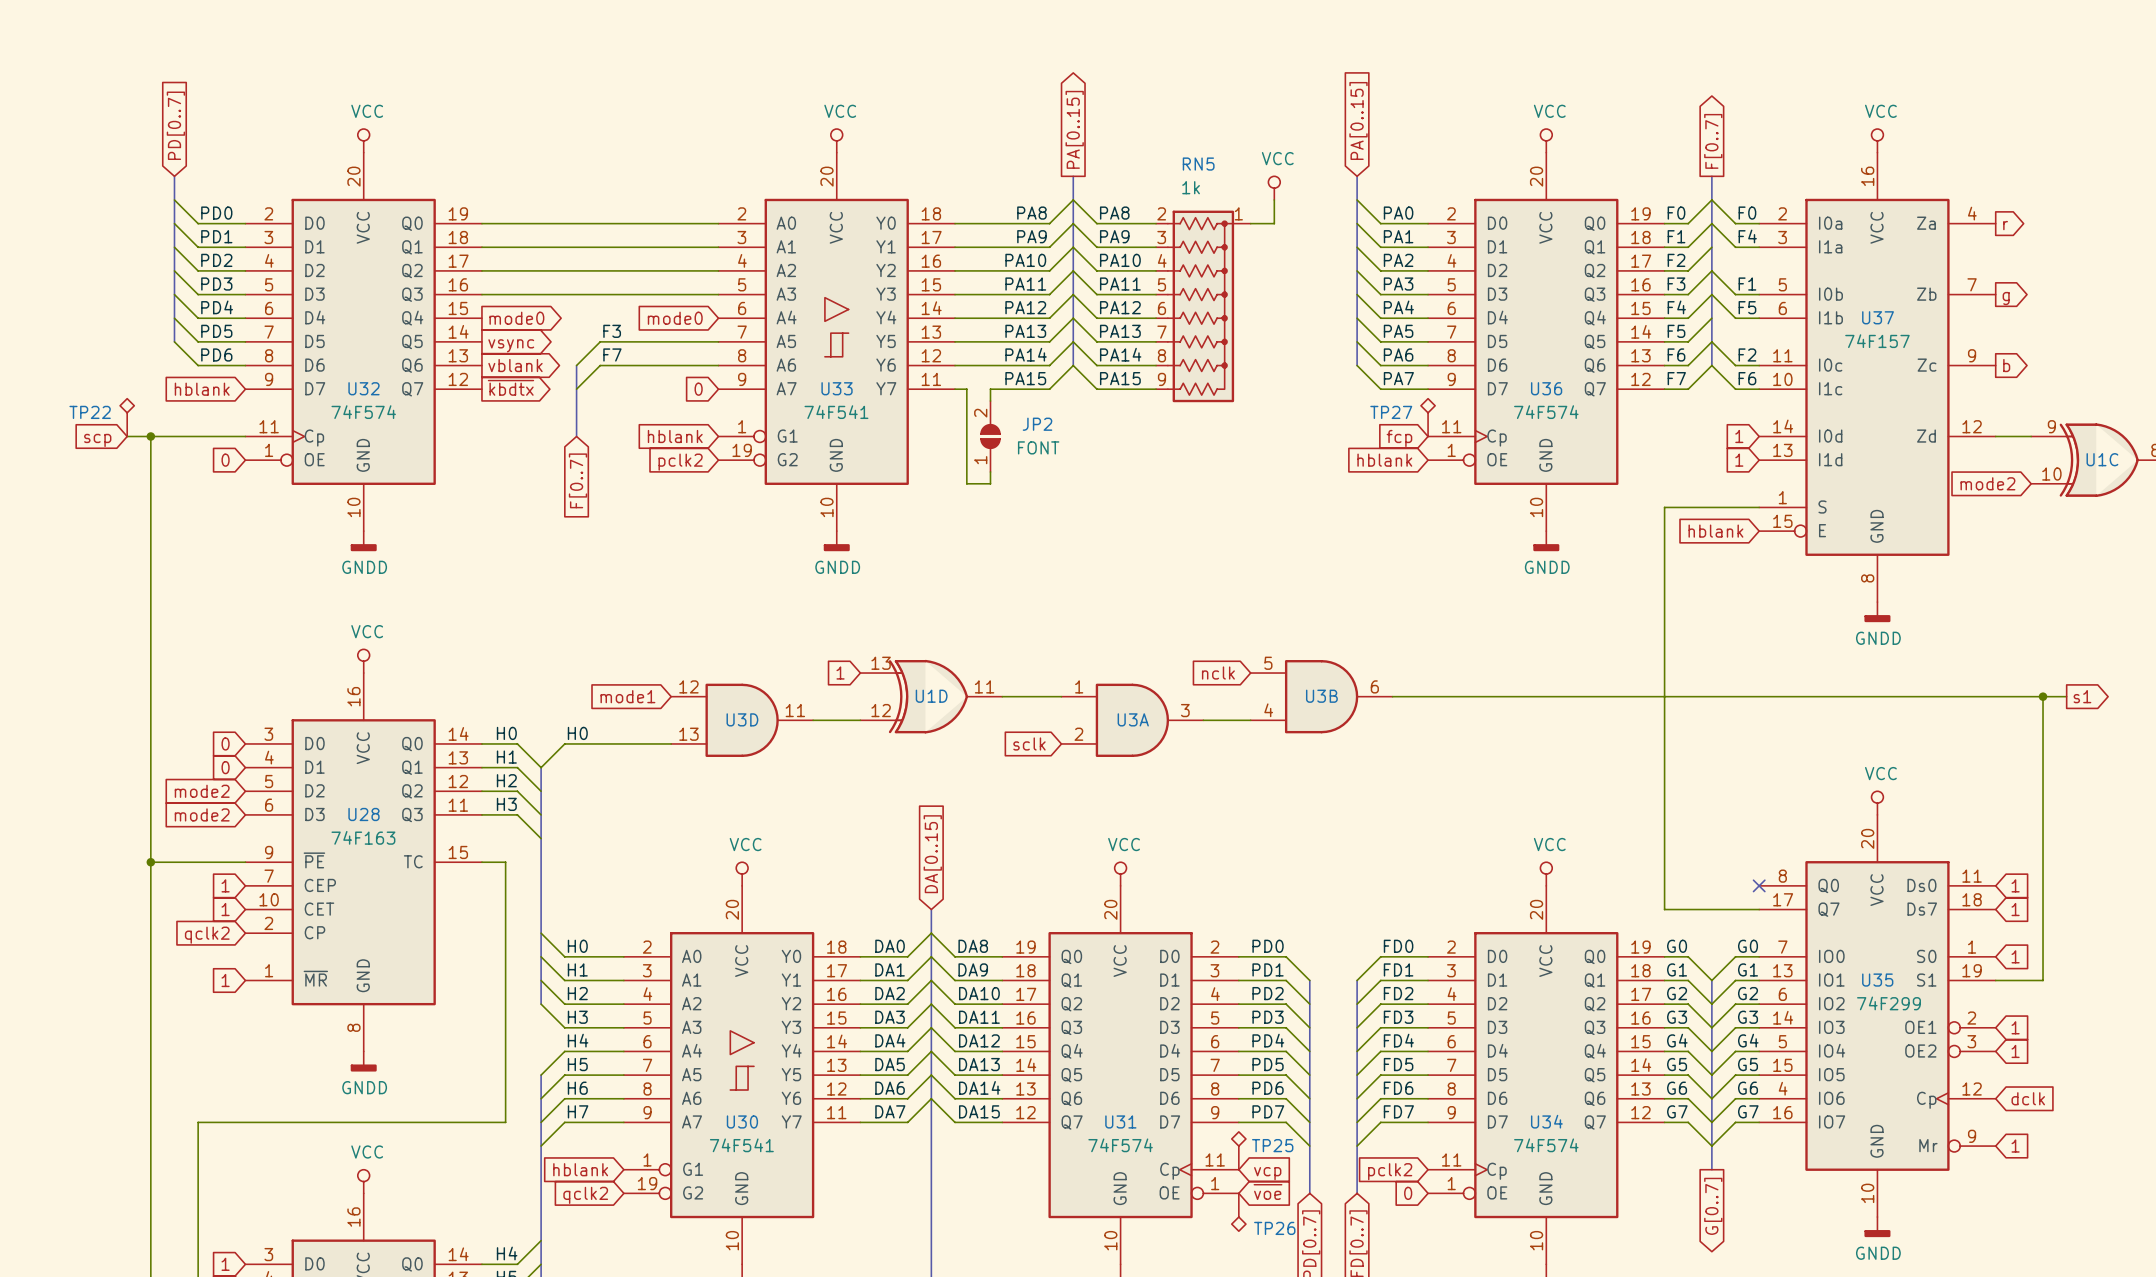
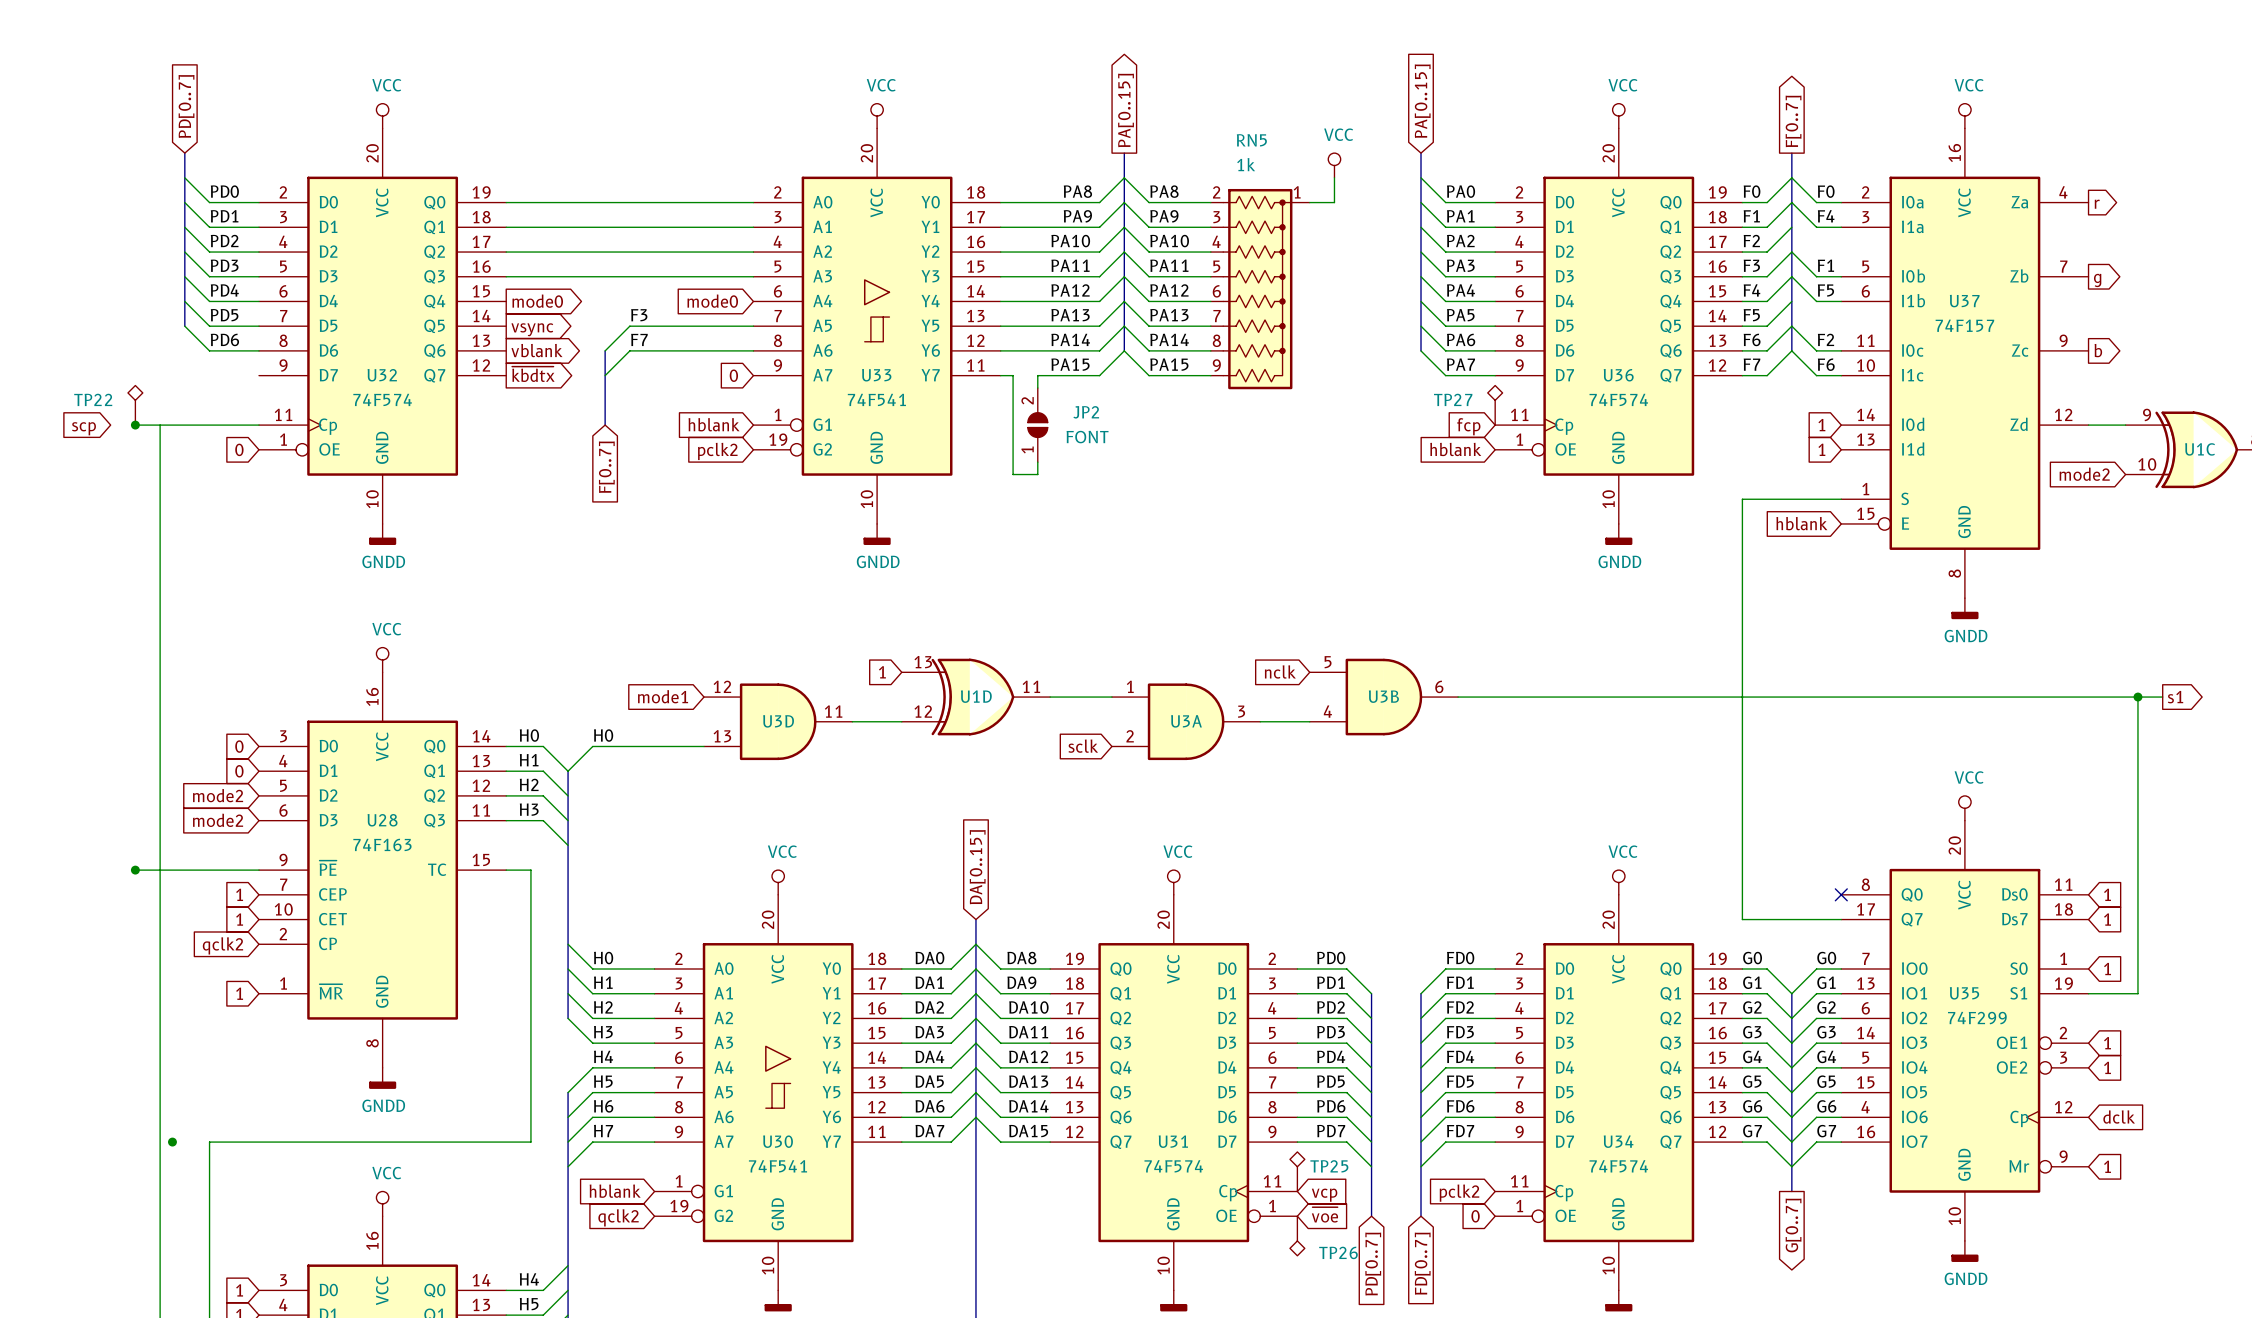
global label: hblank (202, 389) -> none
junction position: (150, 436) -> (135, 425)
global label position: scp (97, 440) -> scp (84, 428)
wire: none -> (135, 870) (160, 870)
junction position: (150, 862) -> (135, 870)
junction: none -> (172, 1142)

